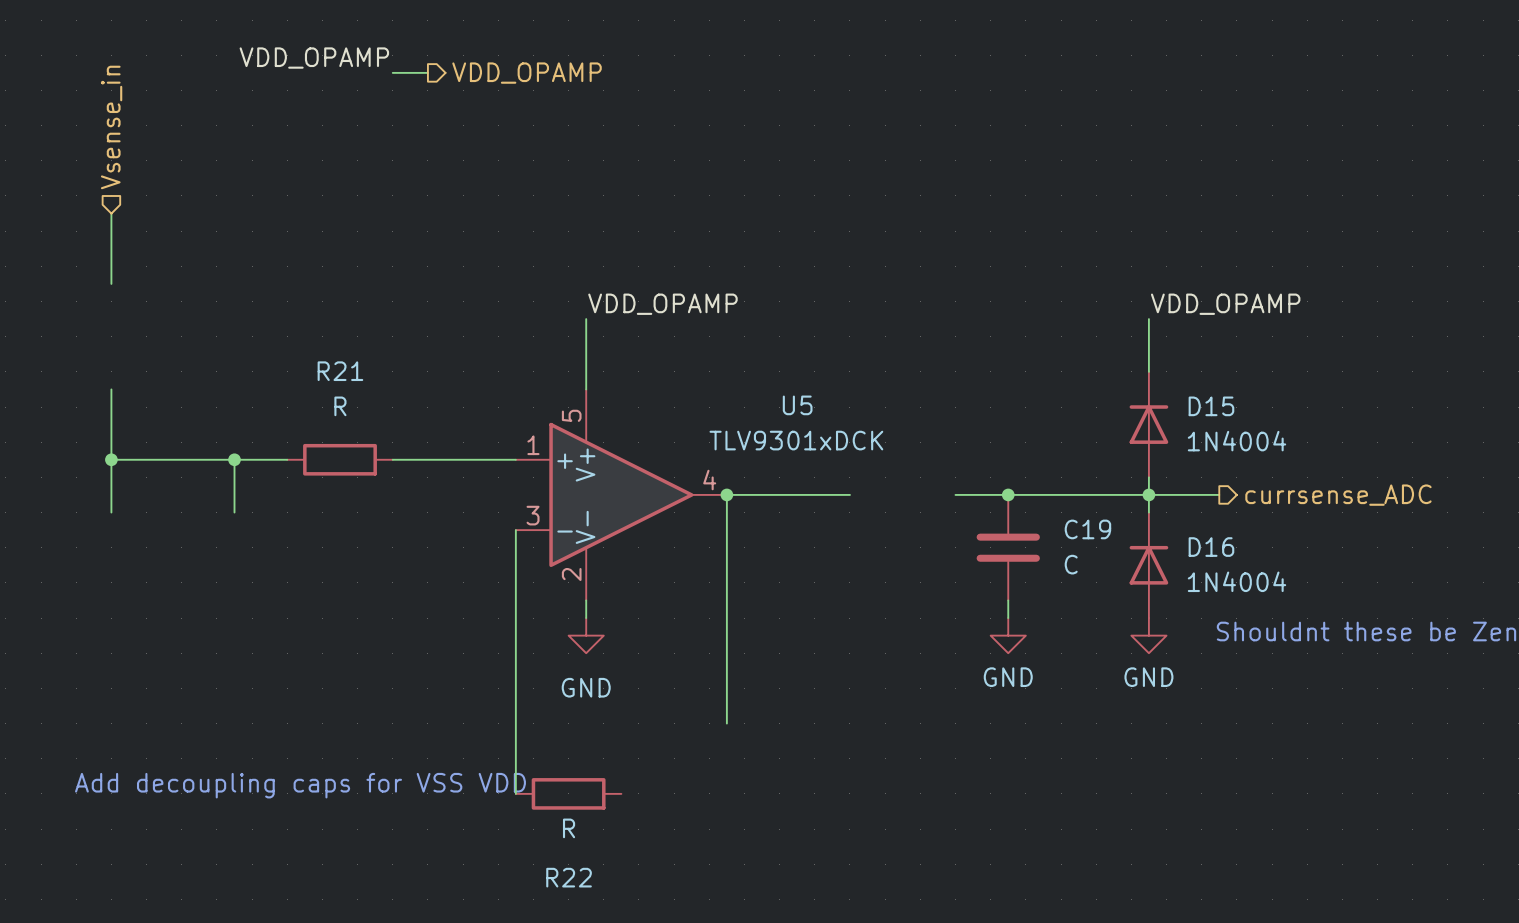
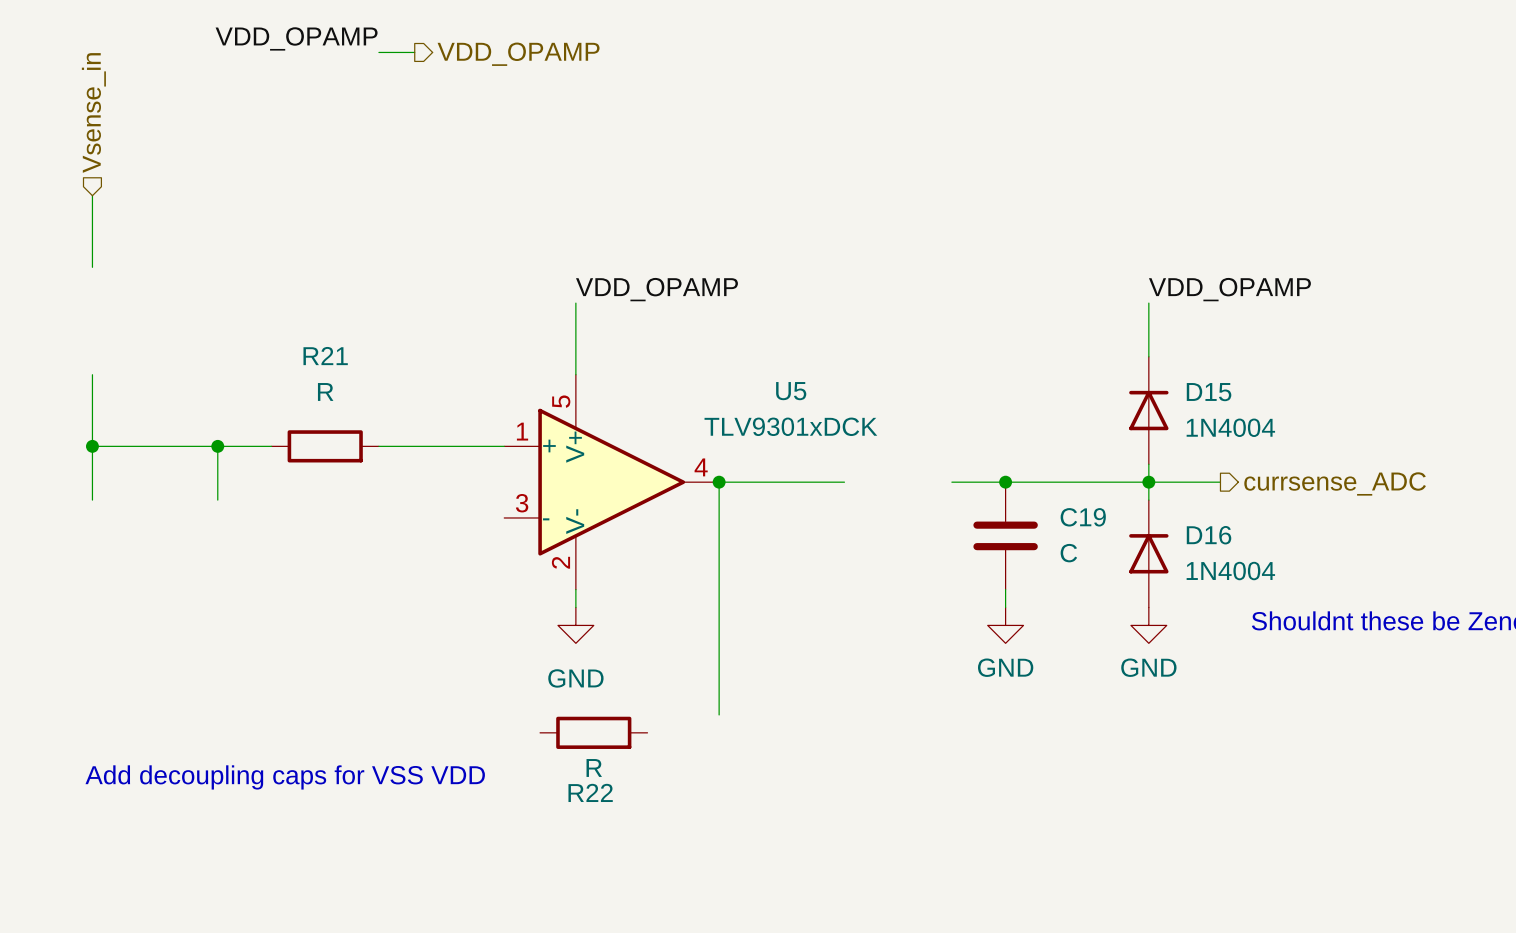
wire: (515, 530) (515, 793) -> none
R22 position: (568, 793) -> (593, 732)
R22 name position: R22 (569, 877) -> R22 (590, 792)

